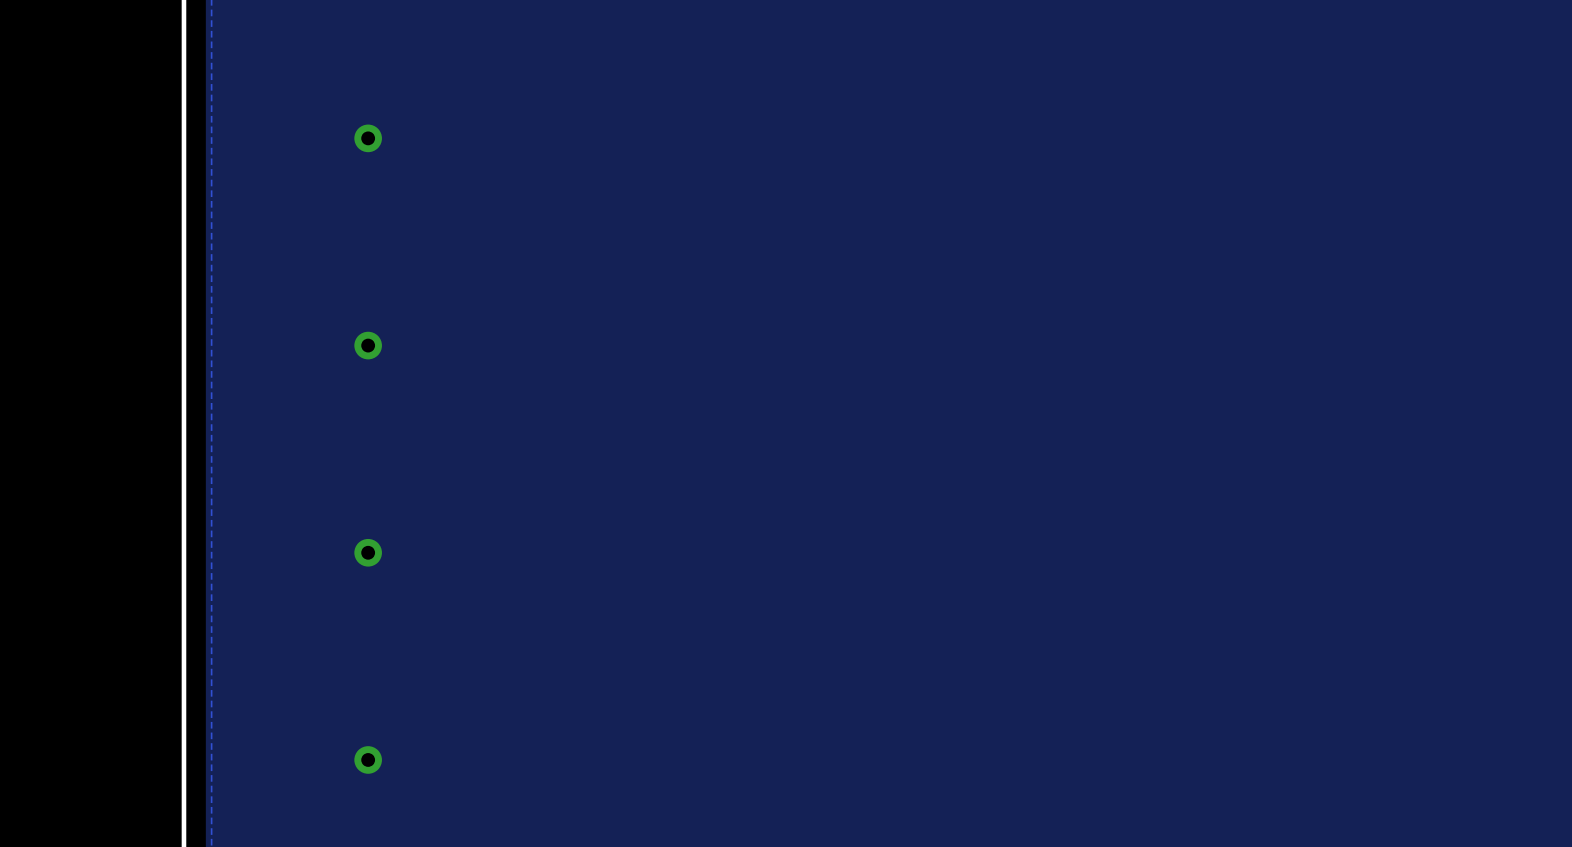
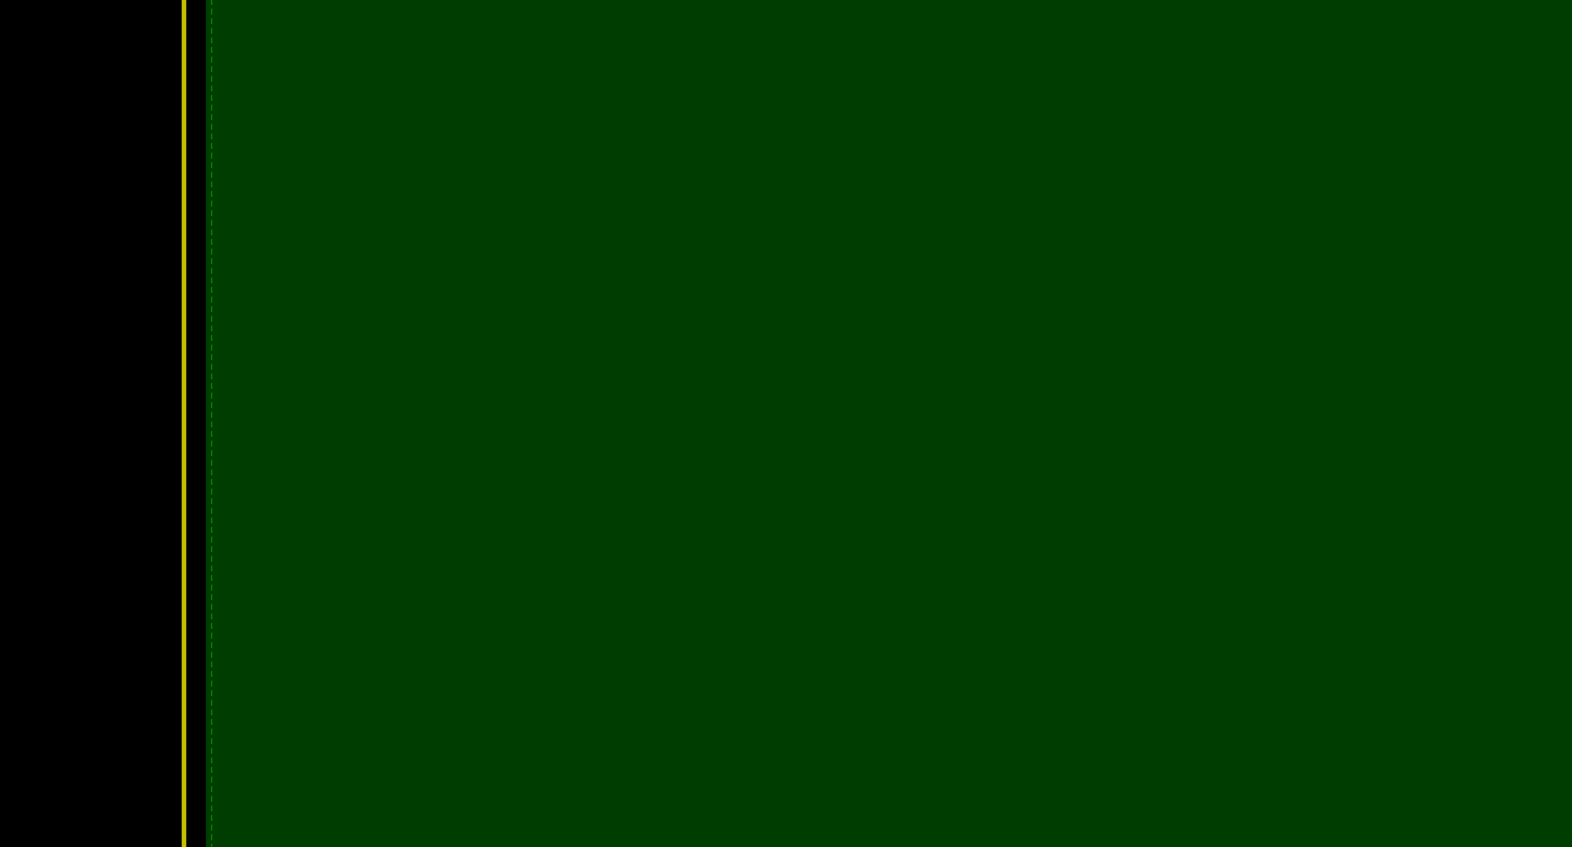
via: (368, 138) -> none
via: (368, 345) -> none
via: (368, 552) -> none
via: (368, 759) -> none

